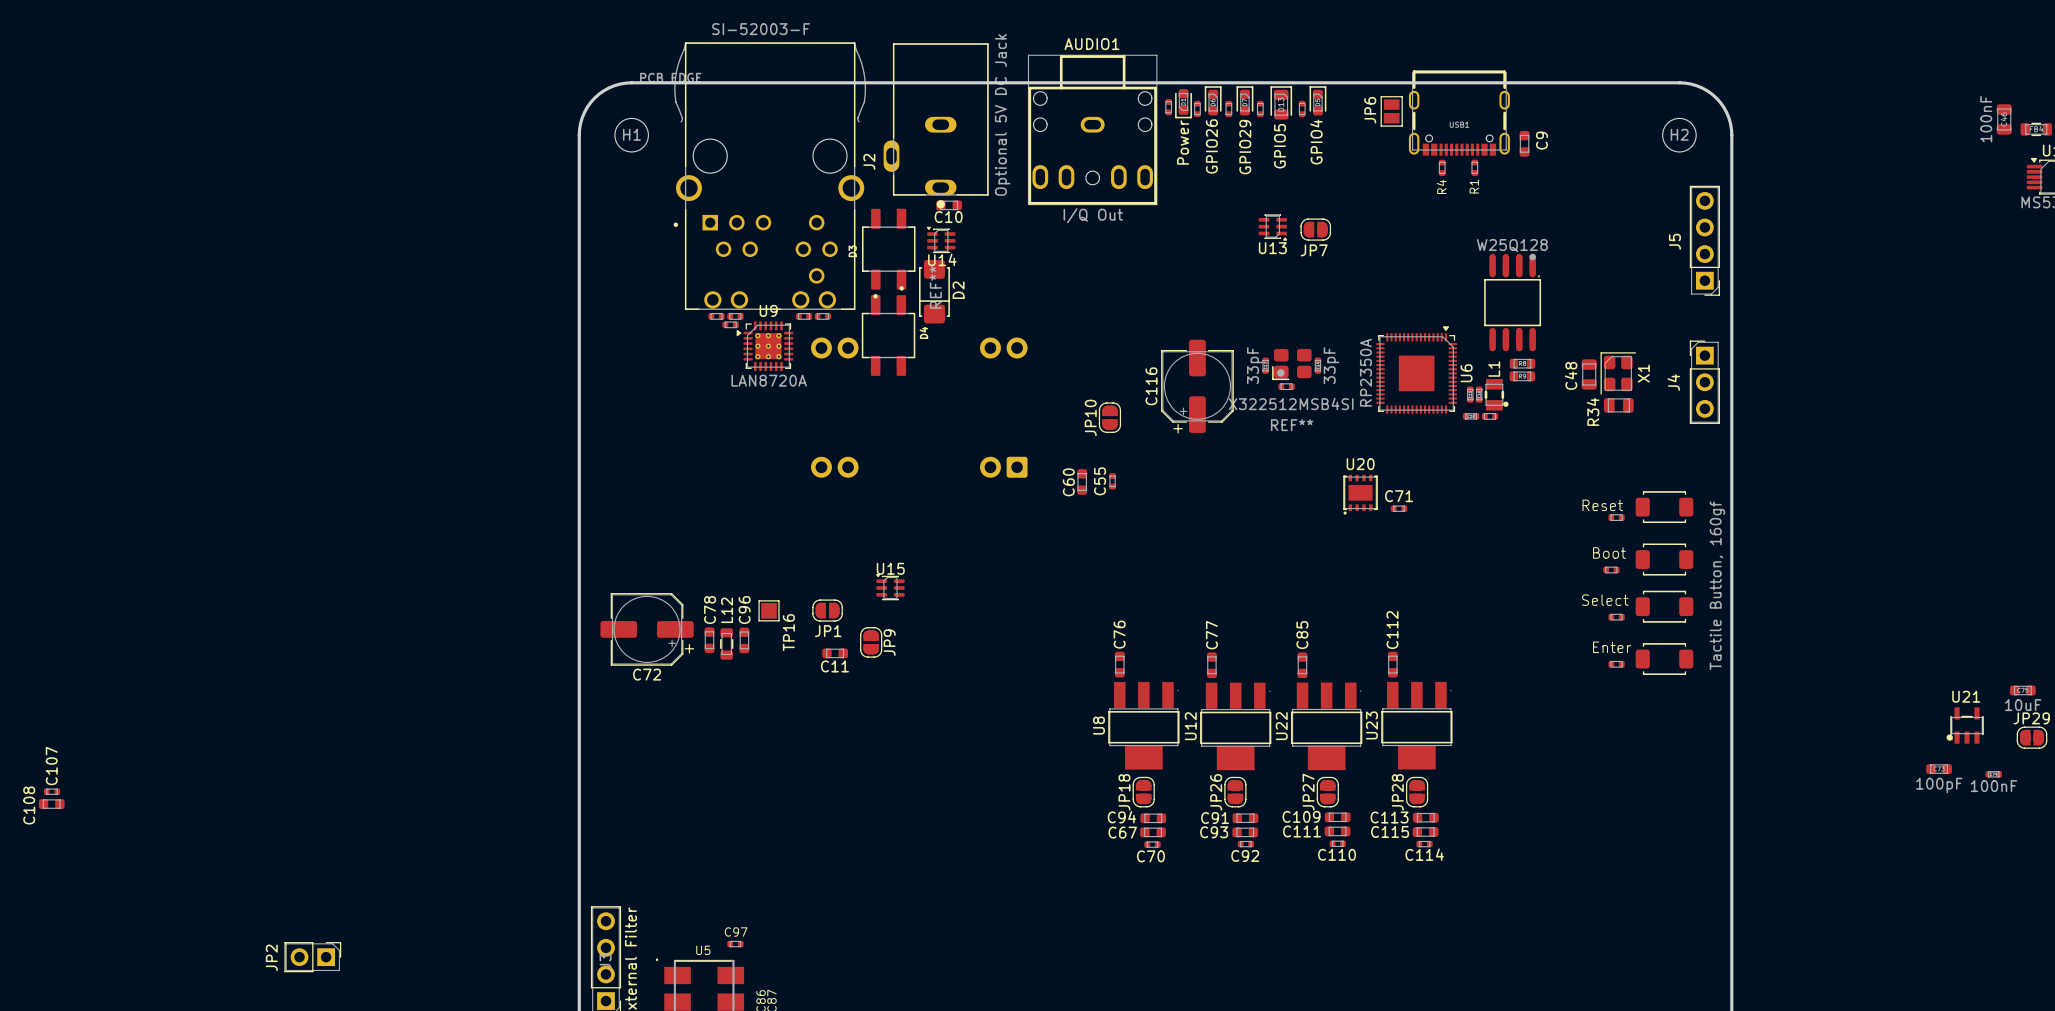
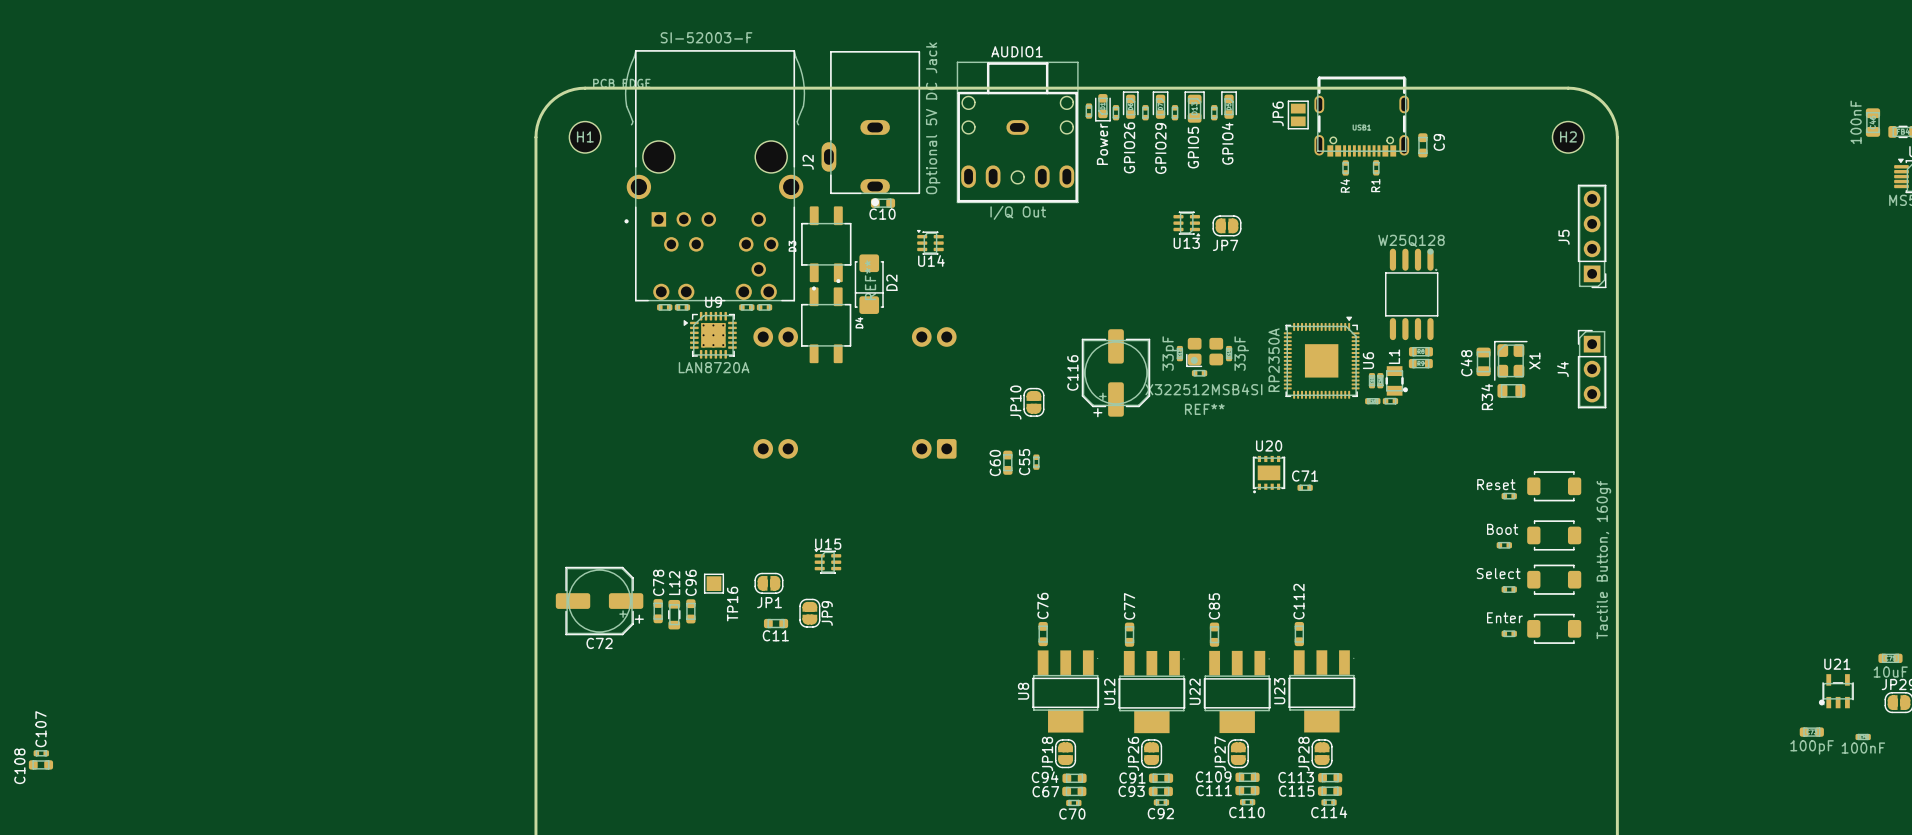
U14 position: (941, 239) -> (930, 242)
part: (730, 324) -> none

